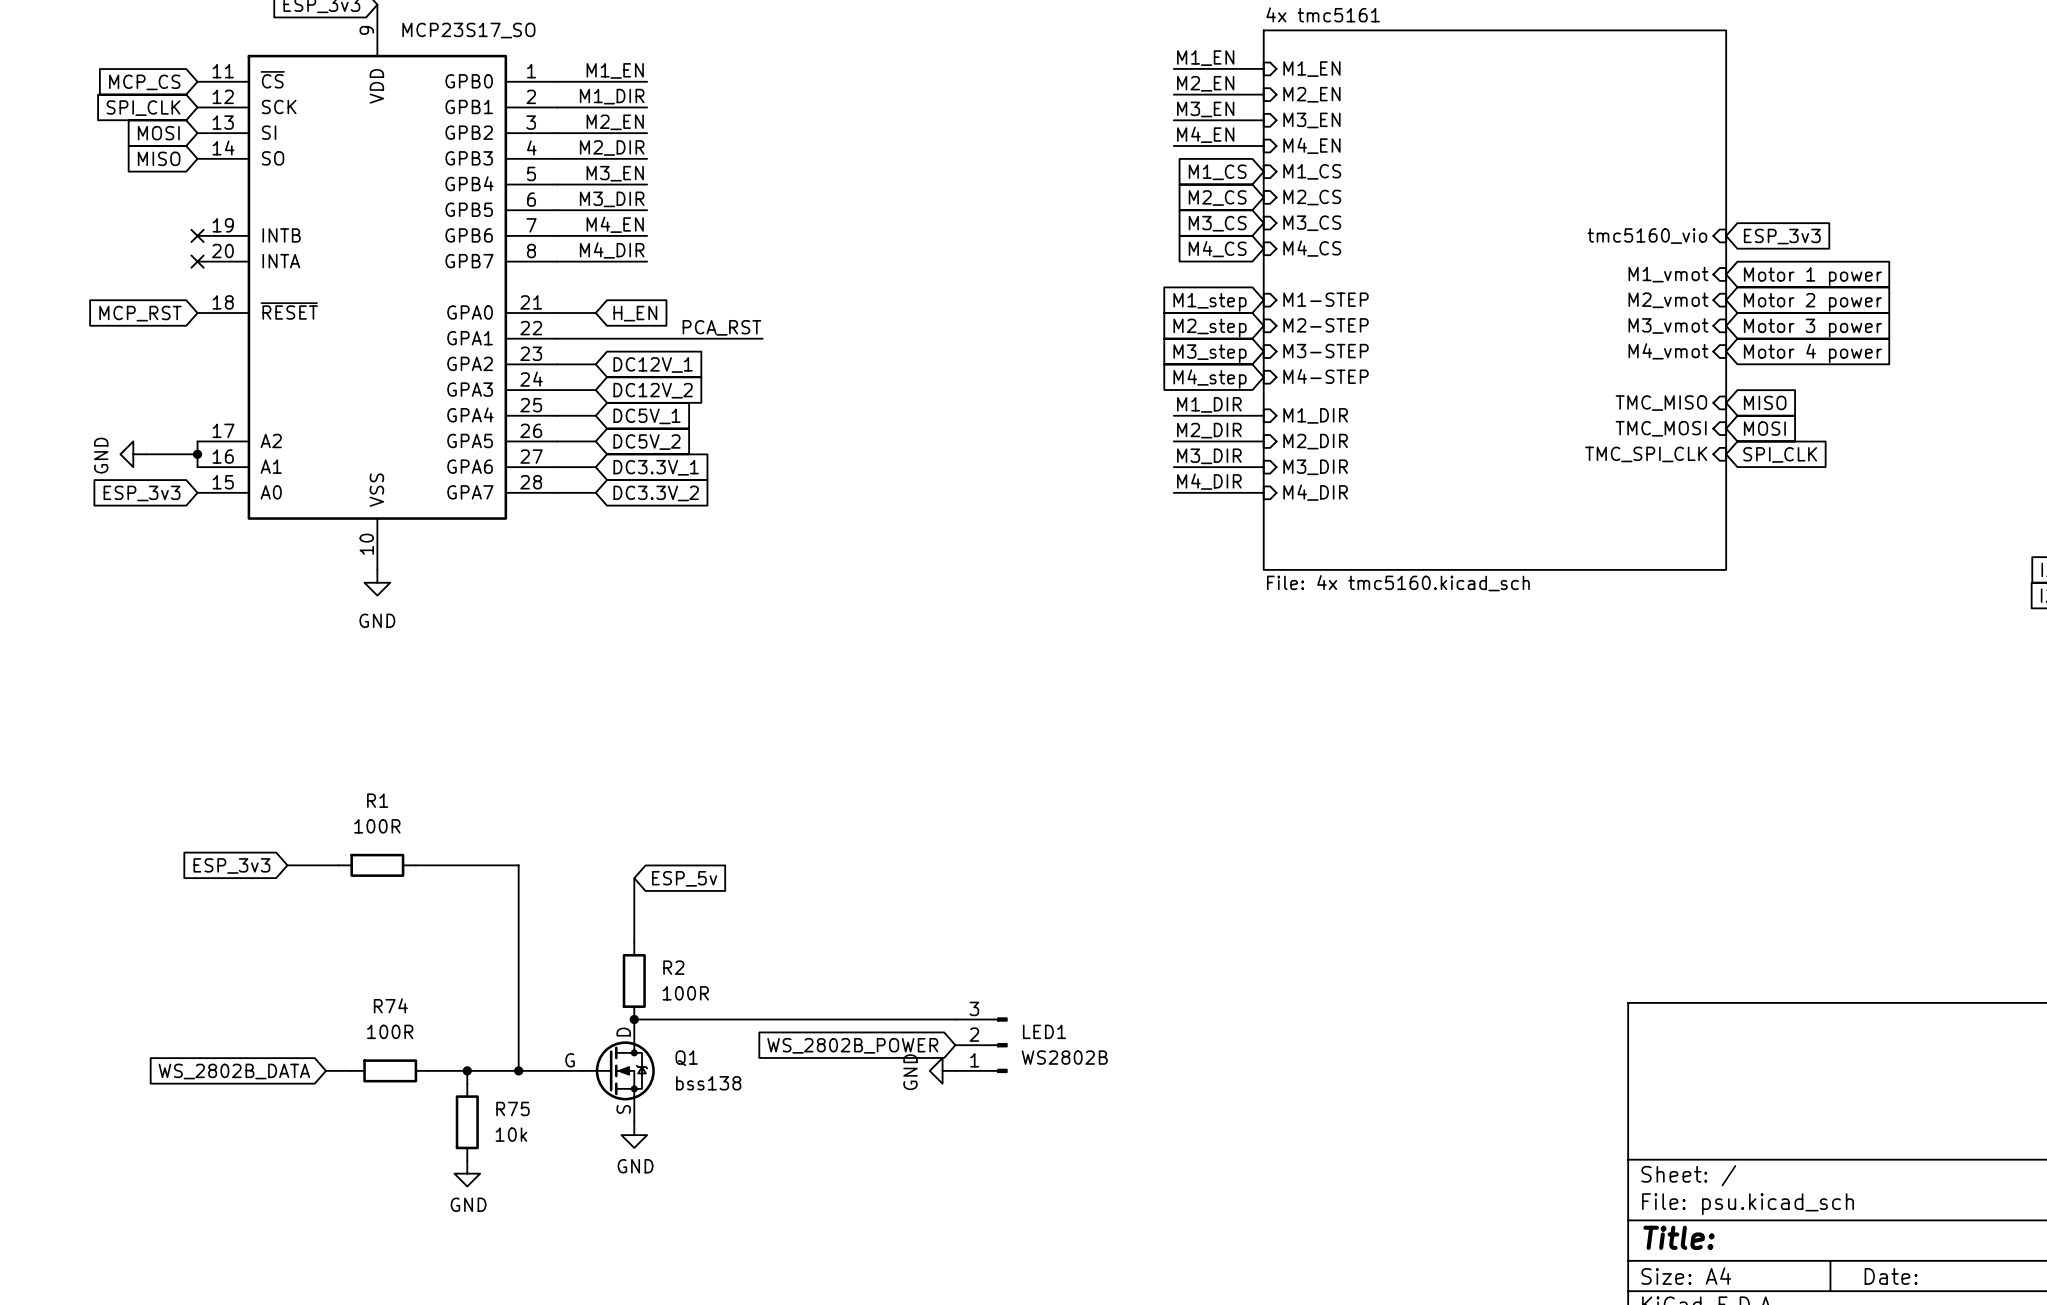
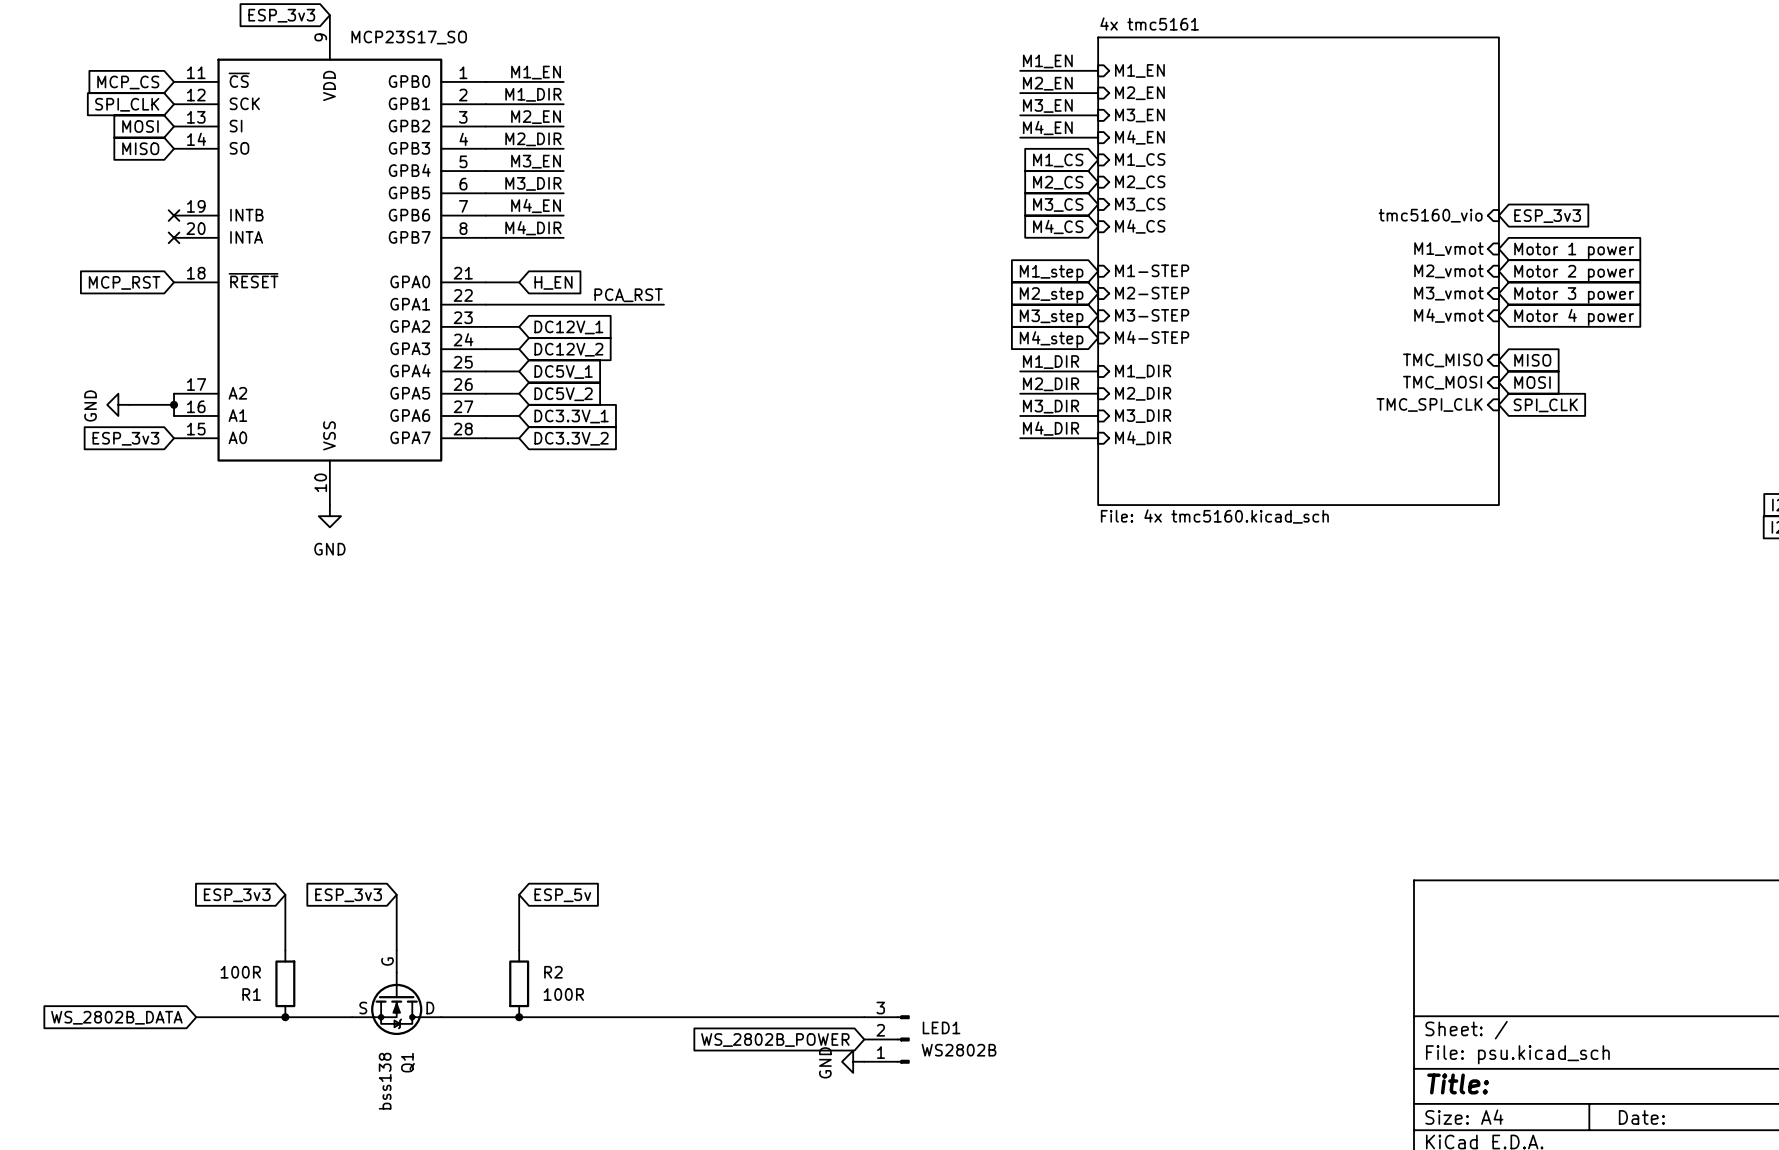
R1 name position: R1 (377, 800) -> R1 (251, 994)
R1 value position: 100R (377, 826) -> 100R (240, 972)
global label: ESP_3v3 (231, 865) -> none
wire: (287, 865) (338, 865) -> none
R1 rotation: 0° (377, 865) -> 90° clockwise (285, 983)
R1 position: (377, 865) -> (285, 983)
wire: (415, 865) (518, 865) (518, 1070) -> none
wire: (634, 878) (634, 942) -> (519, 894) (519, 950)
global label position: ESP_5v (684, 878) -> ESP_5v (562, 895)
R2 position: (634, 980) -> (519, 983)
wire: none -> (285, 894) (285, 950)
wire: none -> (396, 894) (396, 950)
wire: (634, 1019) (955, 1019) -> none
junction: (634, 1019) -> none
global label: none -> ESP_3v3 (237, 895)
global label: none -> ESP_3v3 (348, 895)
global label position: WS_2802B_POWER (852, 1045) -> WS_2802B_POWER (775, 1040)
LED1 position: (981, 1045) -> (886, 1039)
wire: (325, 1070) (351, 1070) -> none
R74: 100R (390, 1070) -> none
wire: (428, 1070) (557, 1070) -> none
wire: (467, 1070) (467, 1083) -> none
junction: (467, 1070) -> none
junction: (518, 1070) -> none
Q1 position: (606, 1070) -> (396, 992)
Q1 rotation: 0° (618, 1070) -> 90° clockwise (396, 1003)
power symbol position: GND (942, 1070) -> GND (853, 1061)
global label position: WS_2802B_DATA (234, 1071) -> WS_2802B_DATA (116, 1017)
R75: 10k (467, 1122) -> none
power symbol: GND (634, 1135) -> none
wire: none -> (196, 1017) (352, 1017)
junction: none -> (285, 1017)
wire: none -> (441, 1017) (864, 1017)
junction: none -> (519, 1017)
power symbol: GND (467, 1173) -> none

